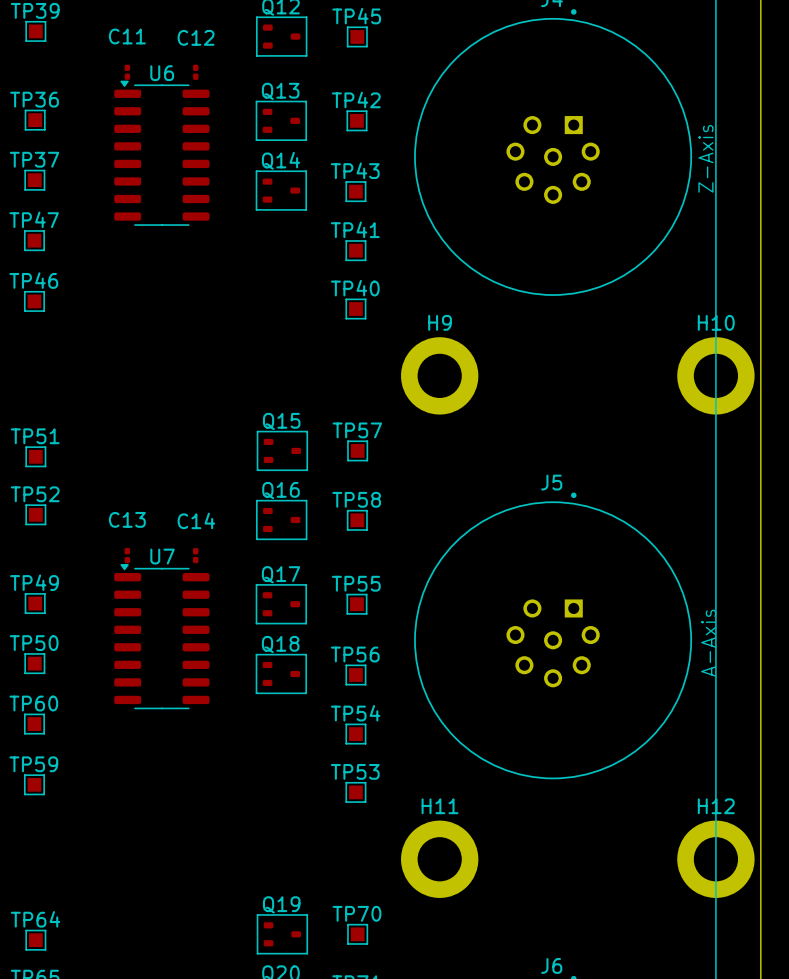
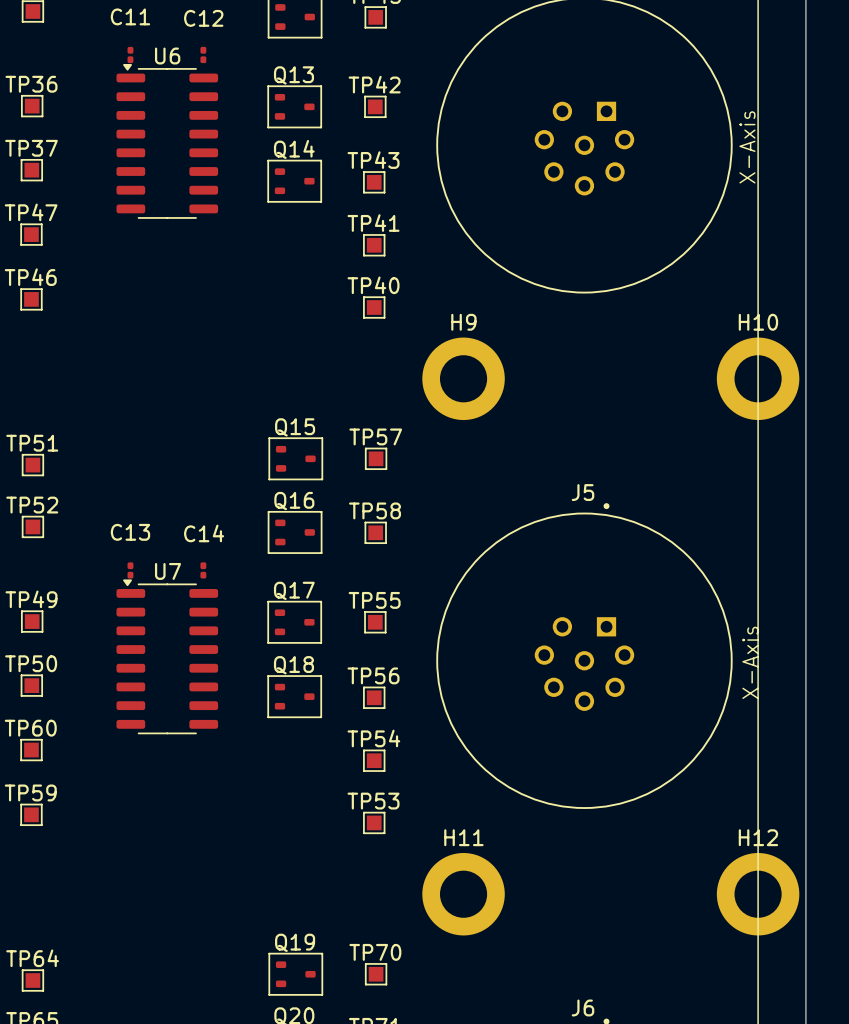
text: Z-Axis (705, 158) -> X-Axis (747, 147)
text: A-Axis (708, 643) -> X-Axis (750, 662)

